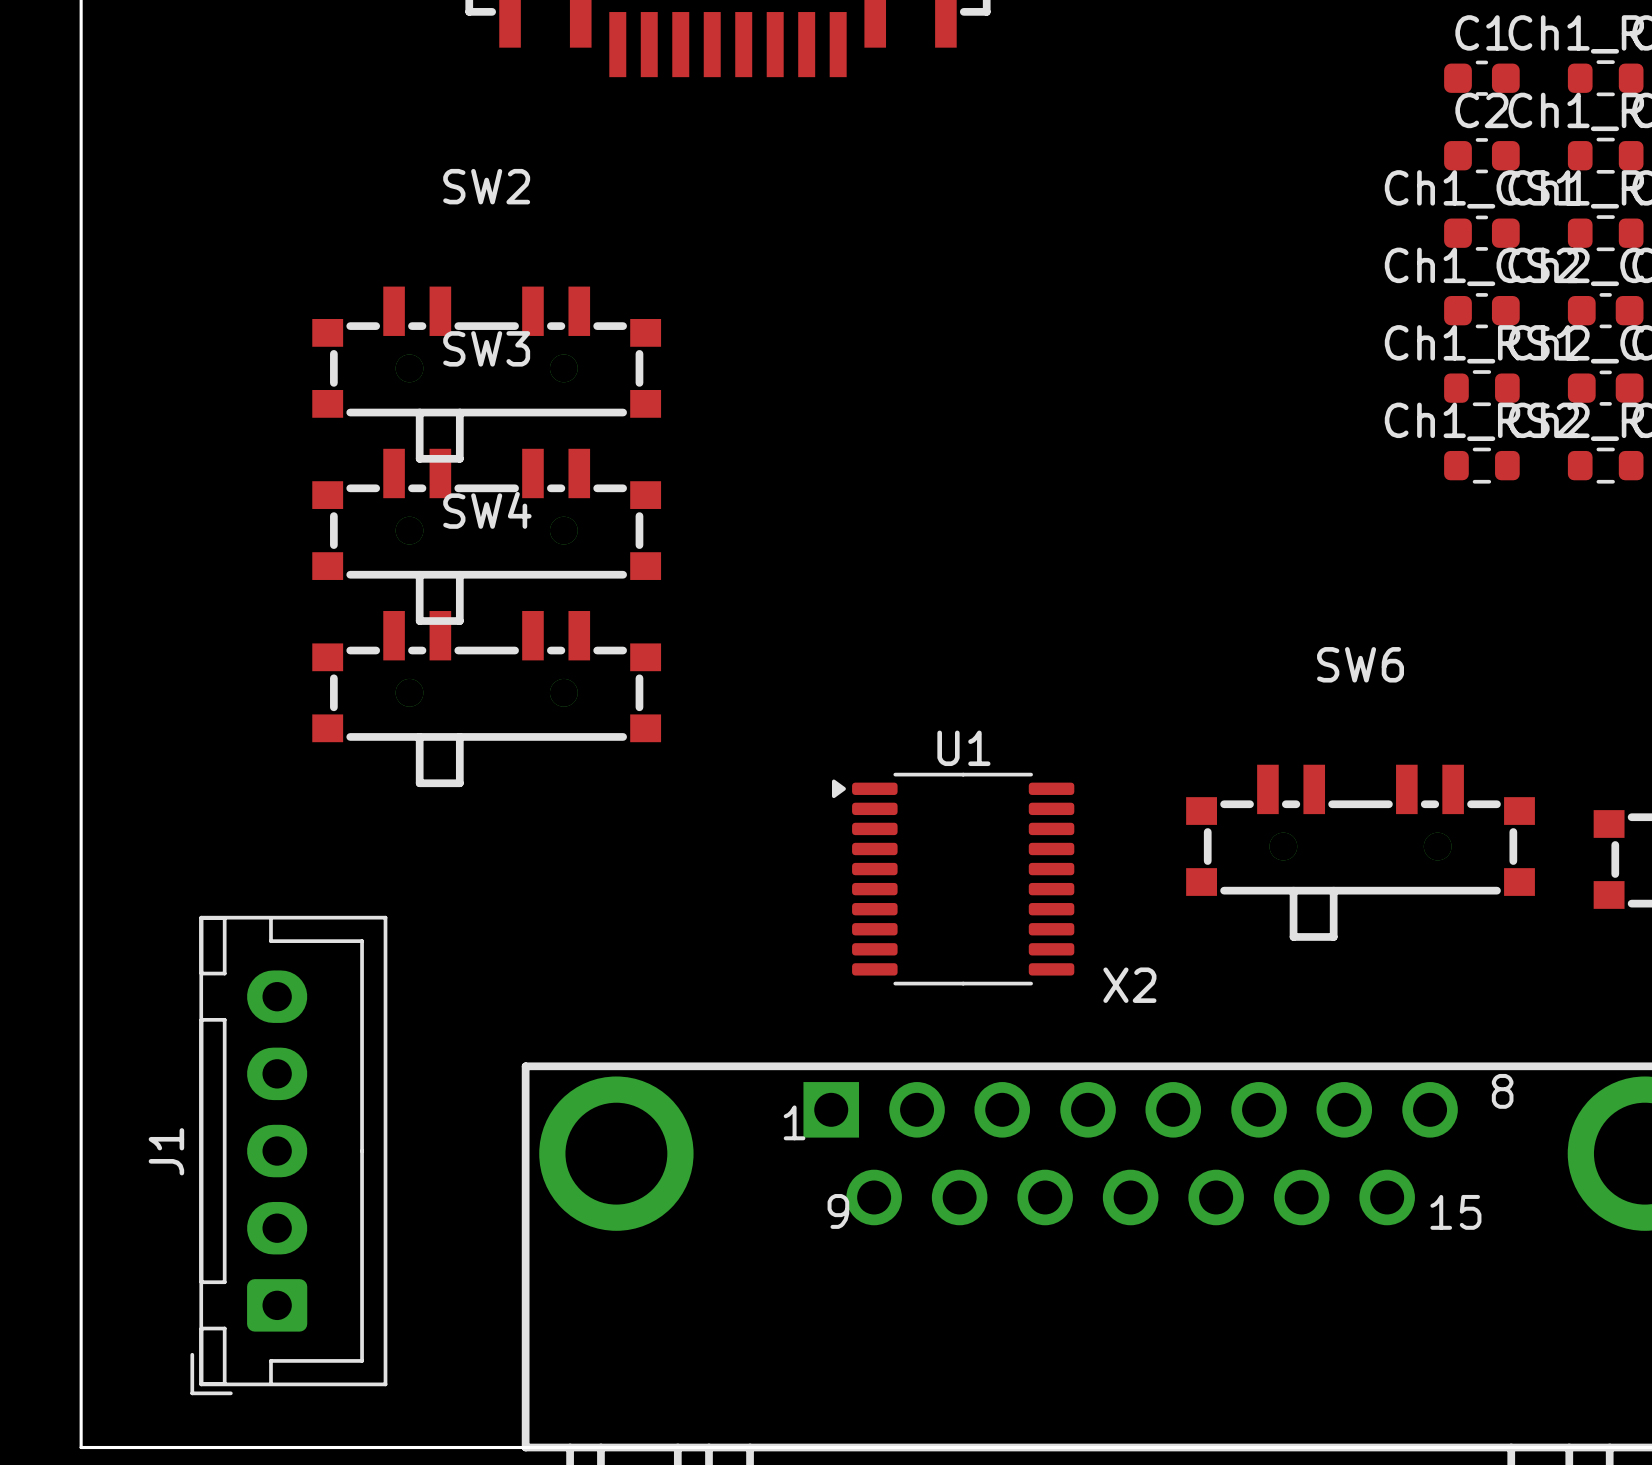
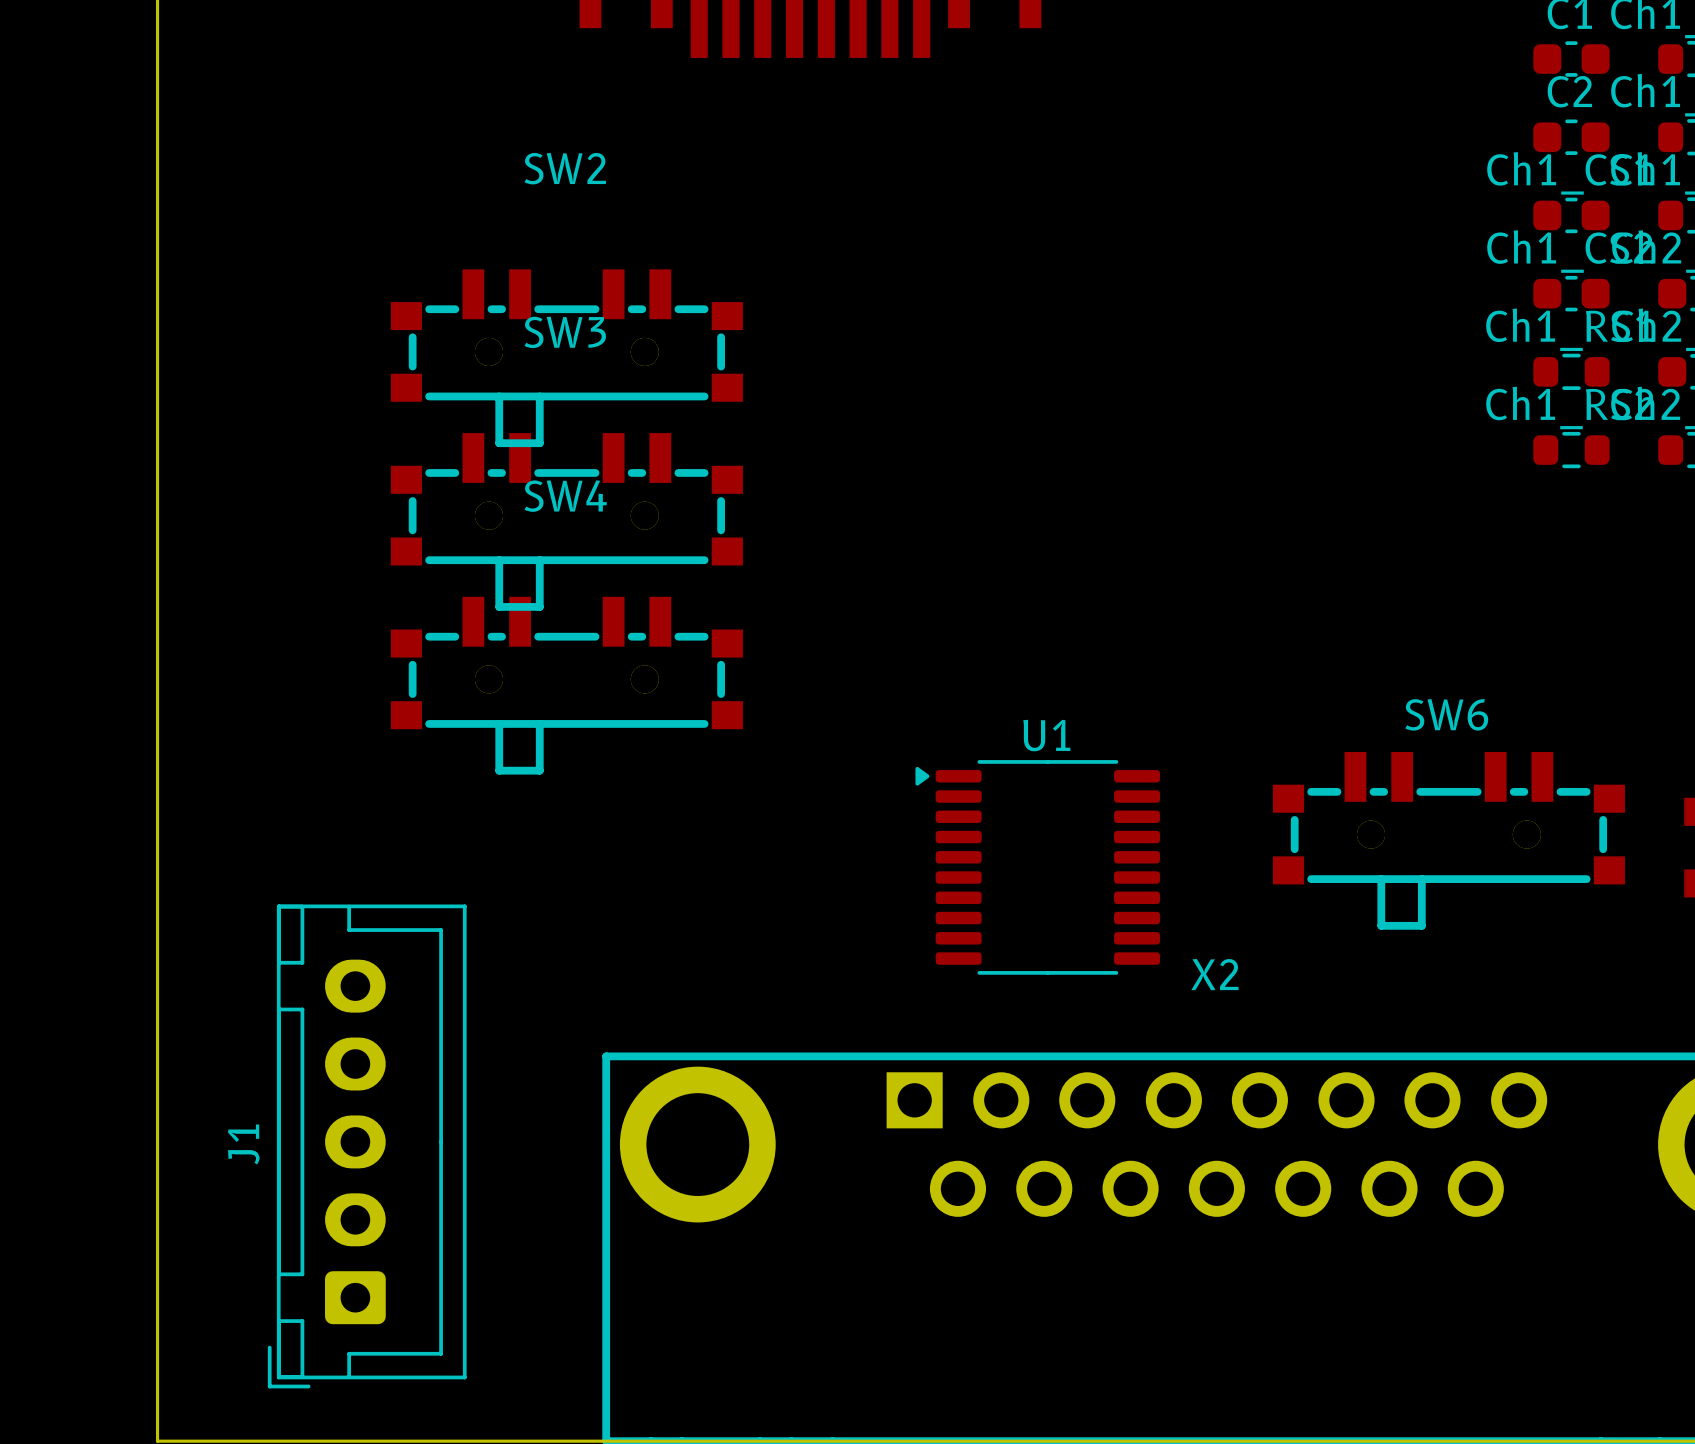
SW6 name position: SW6 (1360, 664) -> SW6 (1446, 714)
X2 text: 8 (1502, 1091) -> none
X2 text: 1 (794, 1122) -> none
X2 text: 9 (838, 1211) -> none
X2 text: 15 (1455, 1212) -> none

